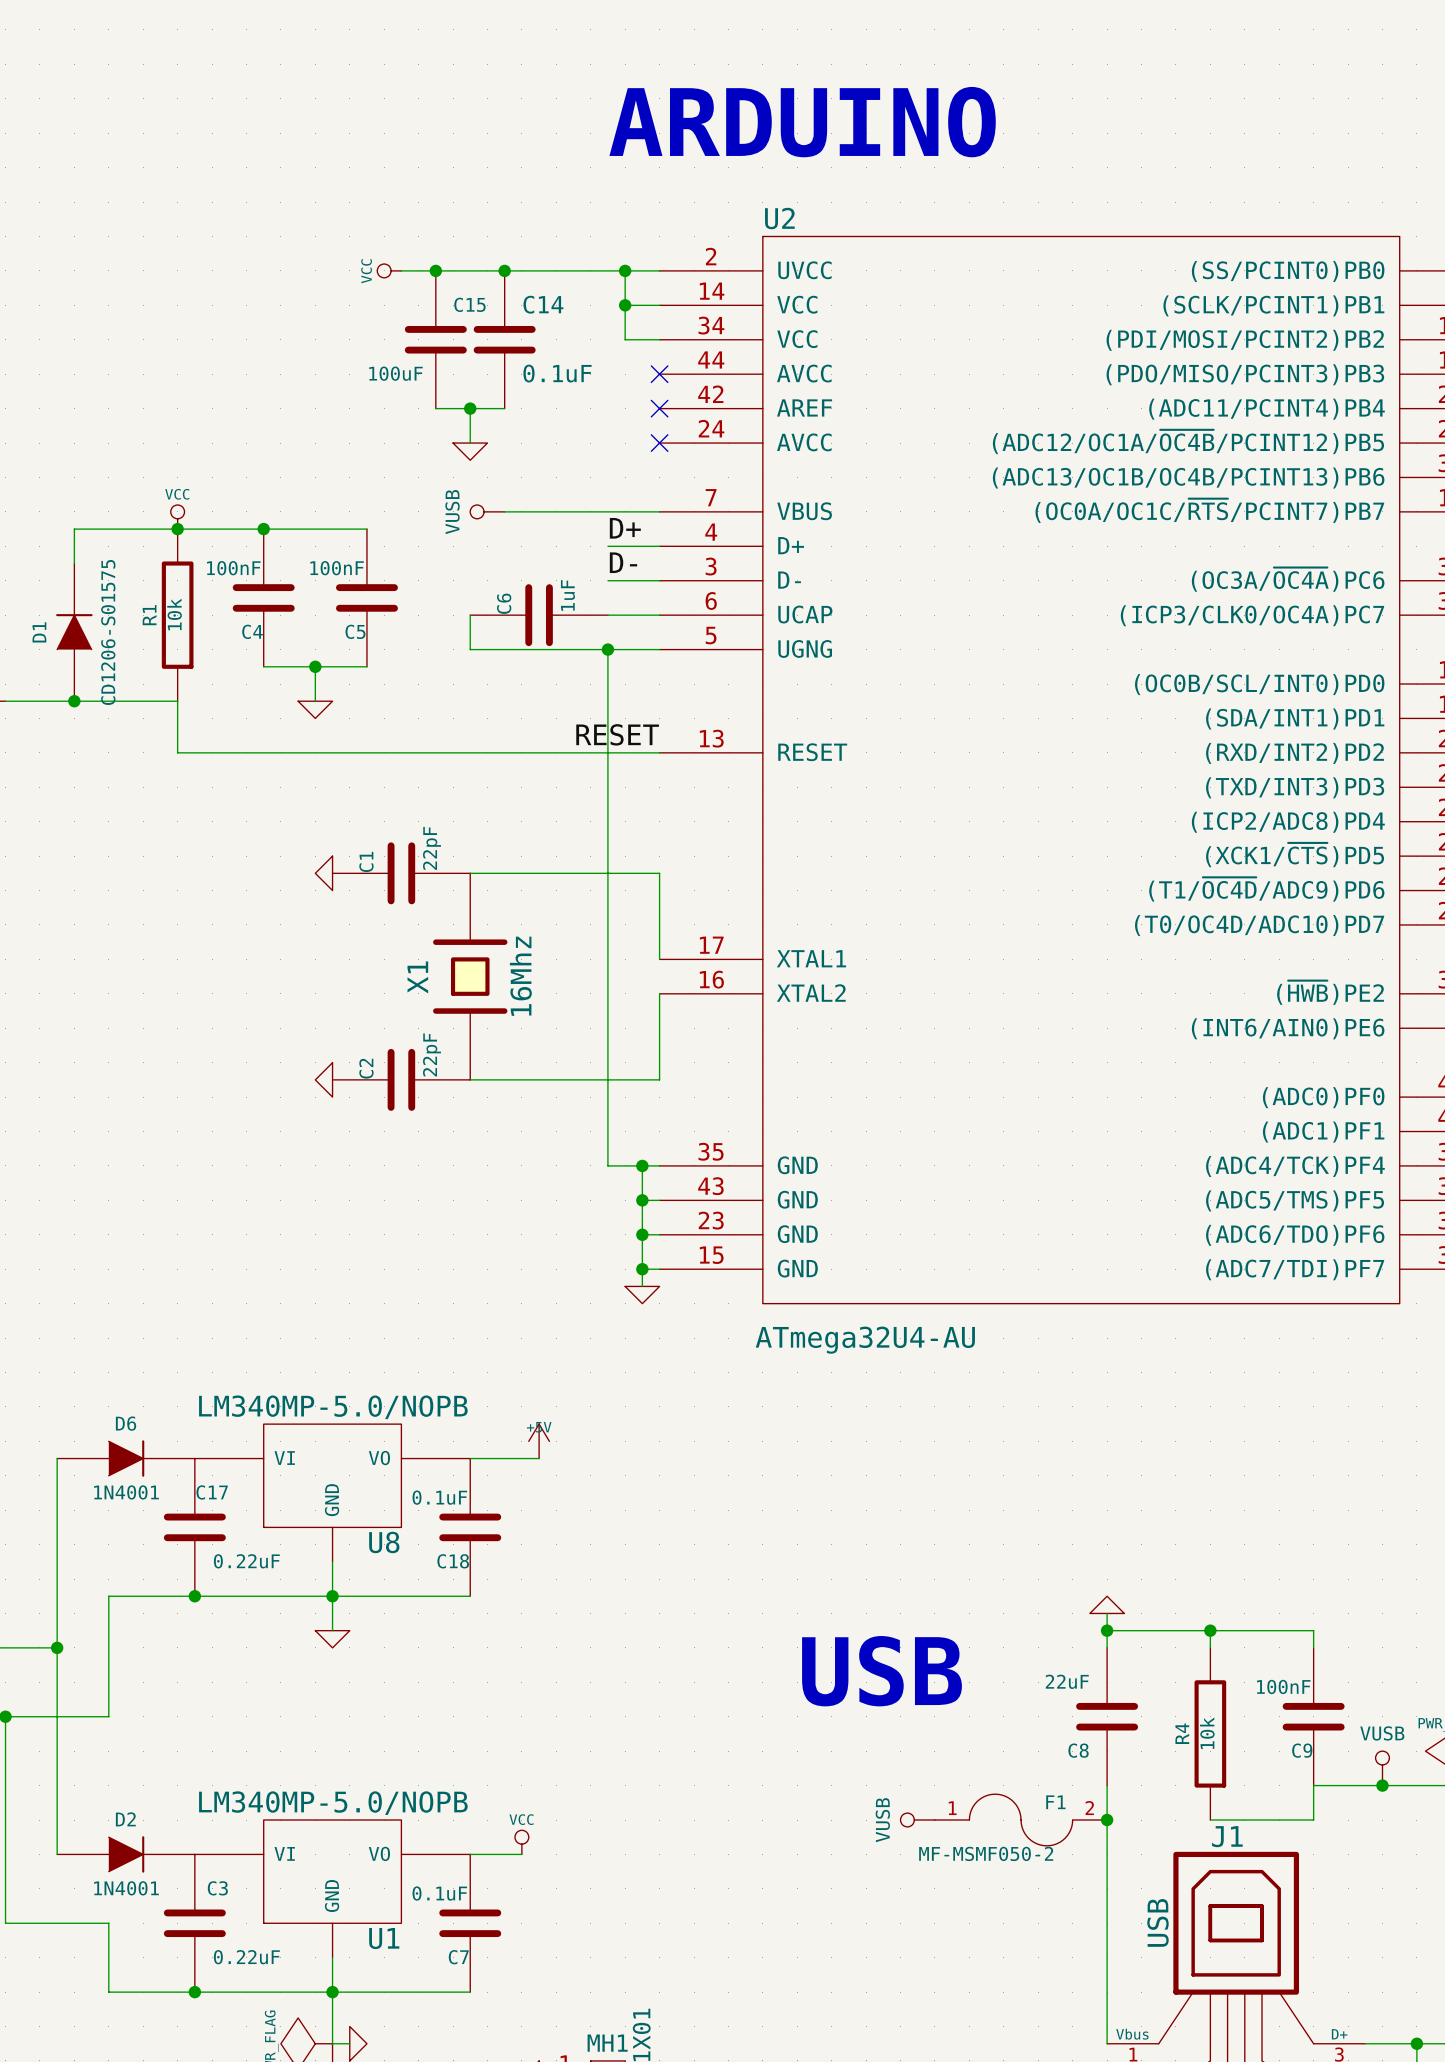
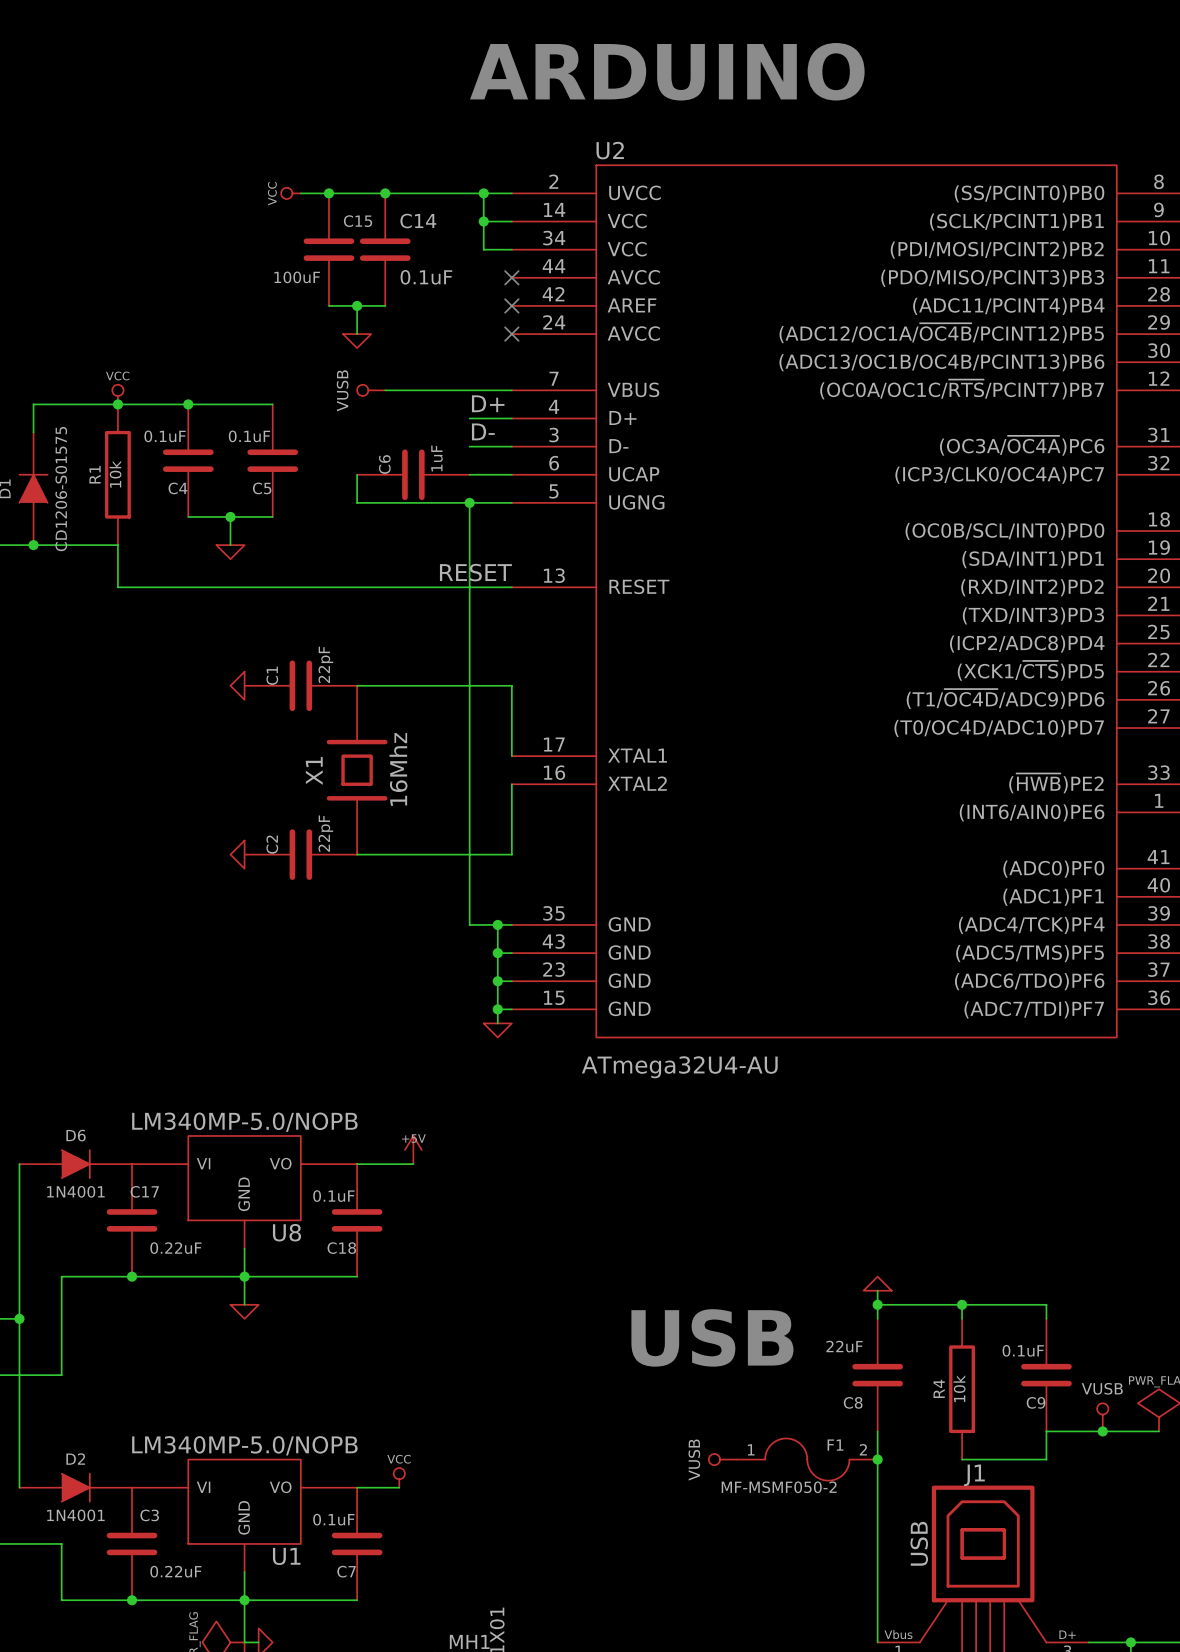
C4 value: 100nF (233, 568) -> 0.1uF (165, 436)
C5 value: 100nF (337, 568) -> 0.1uF (249, 436)
C9 value: 100nF (1283, 1686) -> 0.1uF (1023, 1350)

